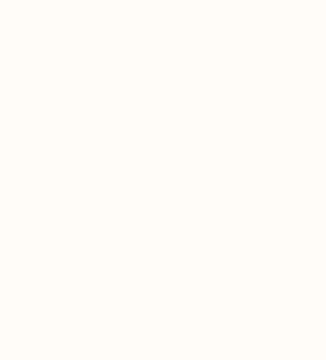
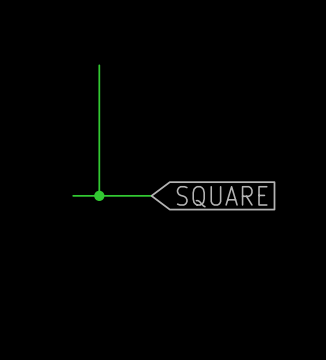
wire: none -> (99, 65) (99, 195)
wire: none -> (73, 195) (151, 195)
junction: none -> (99, 195)
global label: none -> SQUARE (222, 196)

